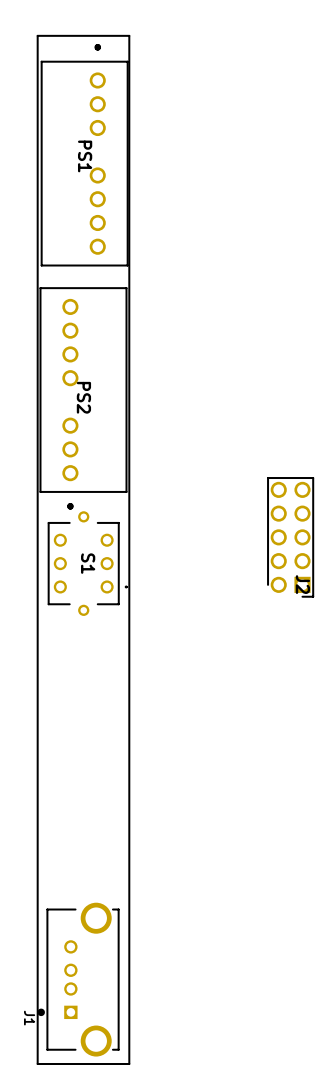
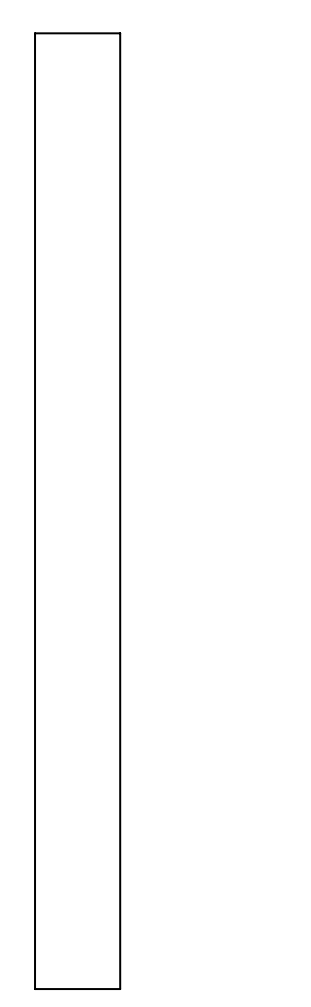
PS1: (84, 155) -> none
PS2: (83, 398) -> none
J2: (290, 537) -> none
S1: (87, 563) -> none
J1: (78, 979) -> none

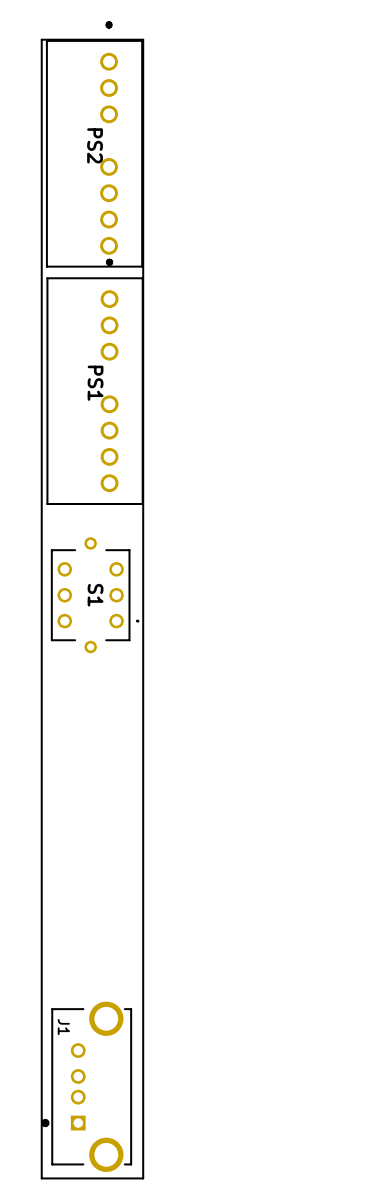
PS2: none -> (94, 144)
PS1: none -> (95, 381)
S1: none -> (95, 595)
J1: none -> (86, 1086)

